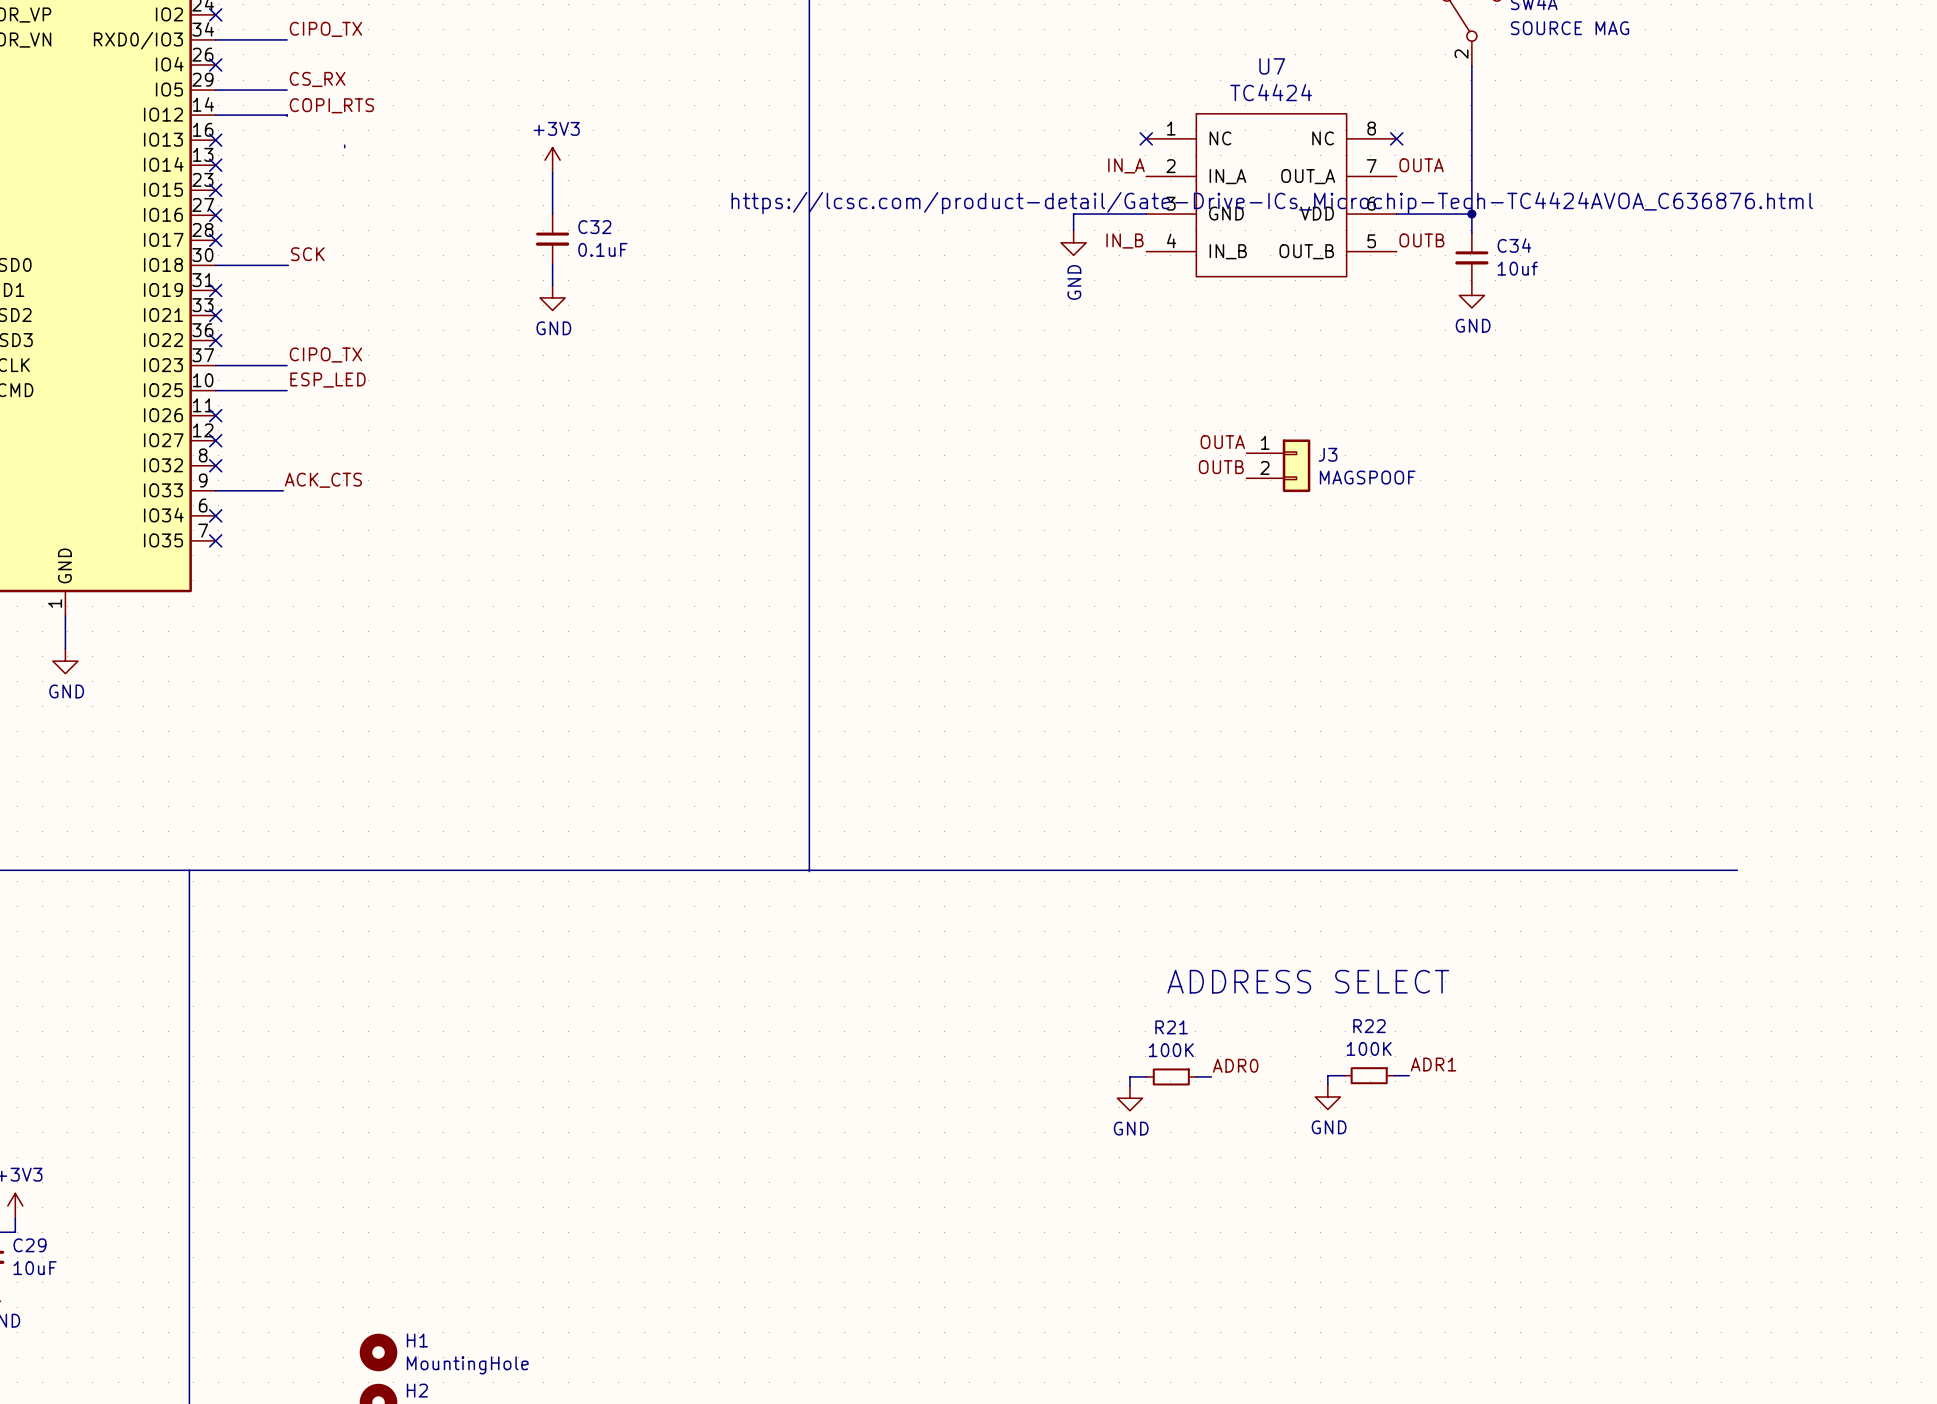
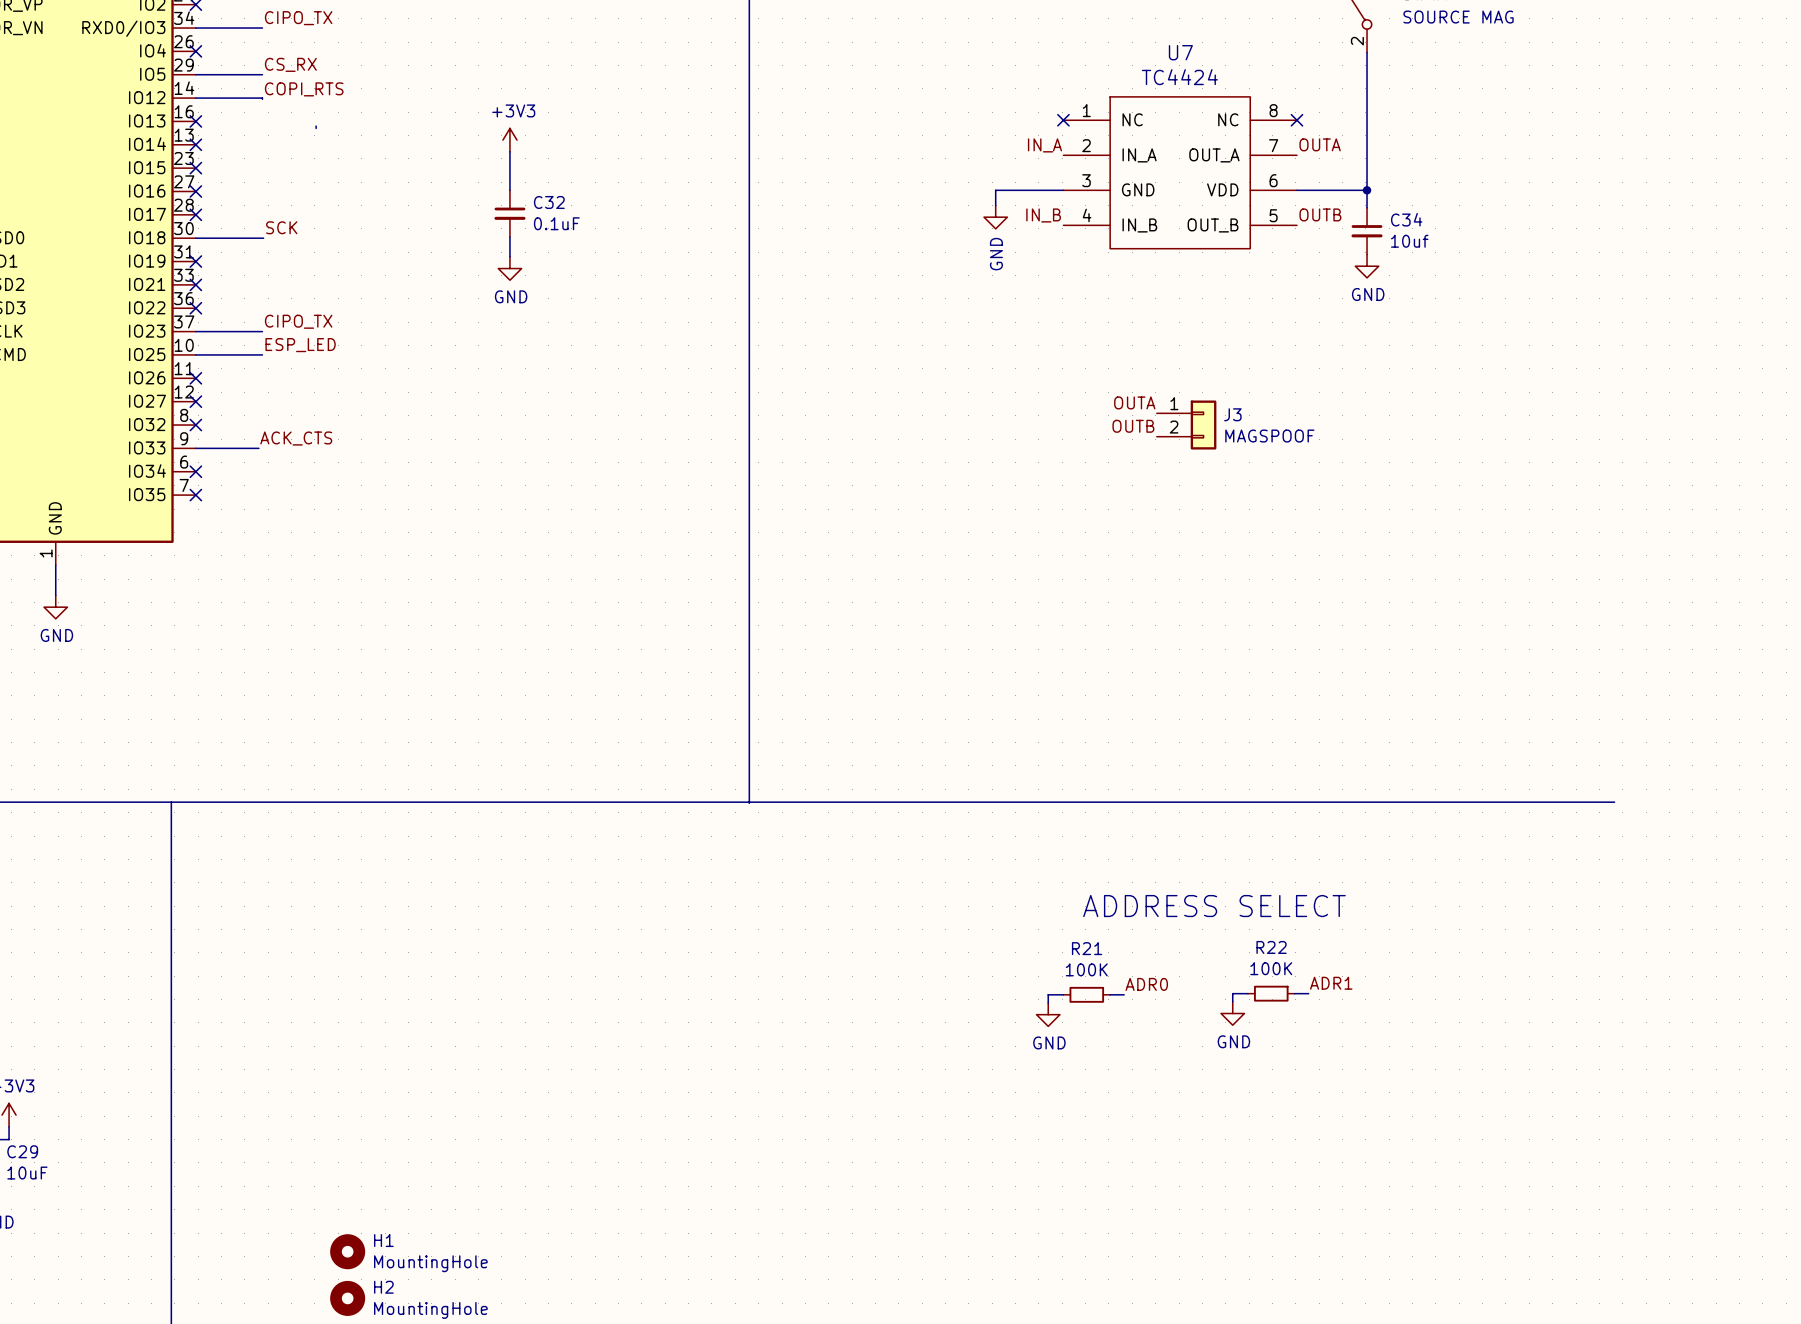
U7 text: https://lcsc.com/product-detail/Gate-Drive-ICs_Microchip-Tech-TC4424AVOA_C636876.html (1272, 203) -> none

